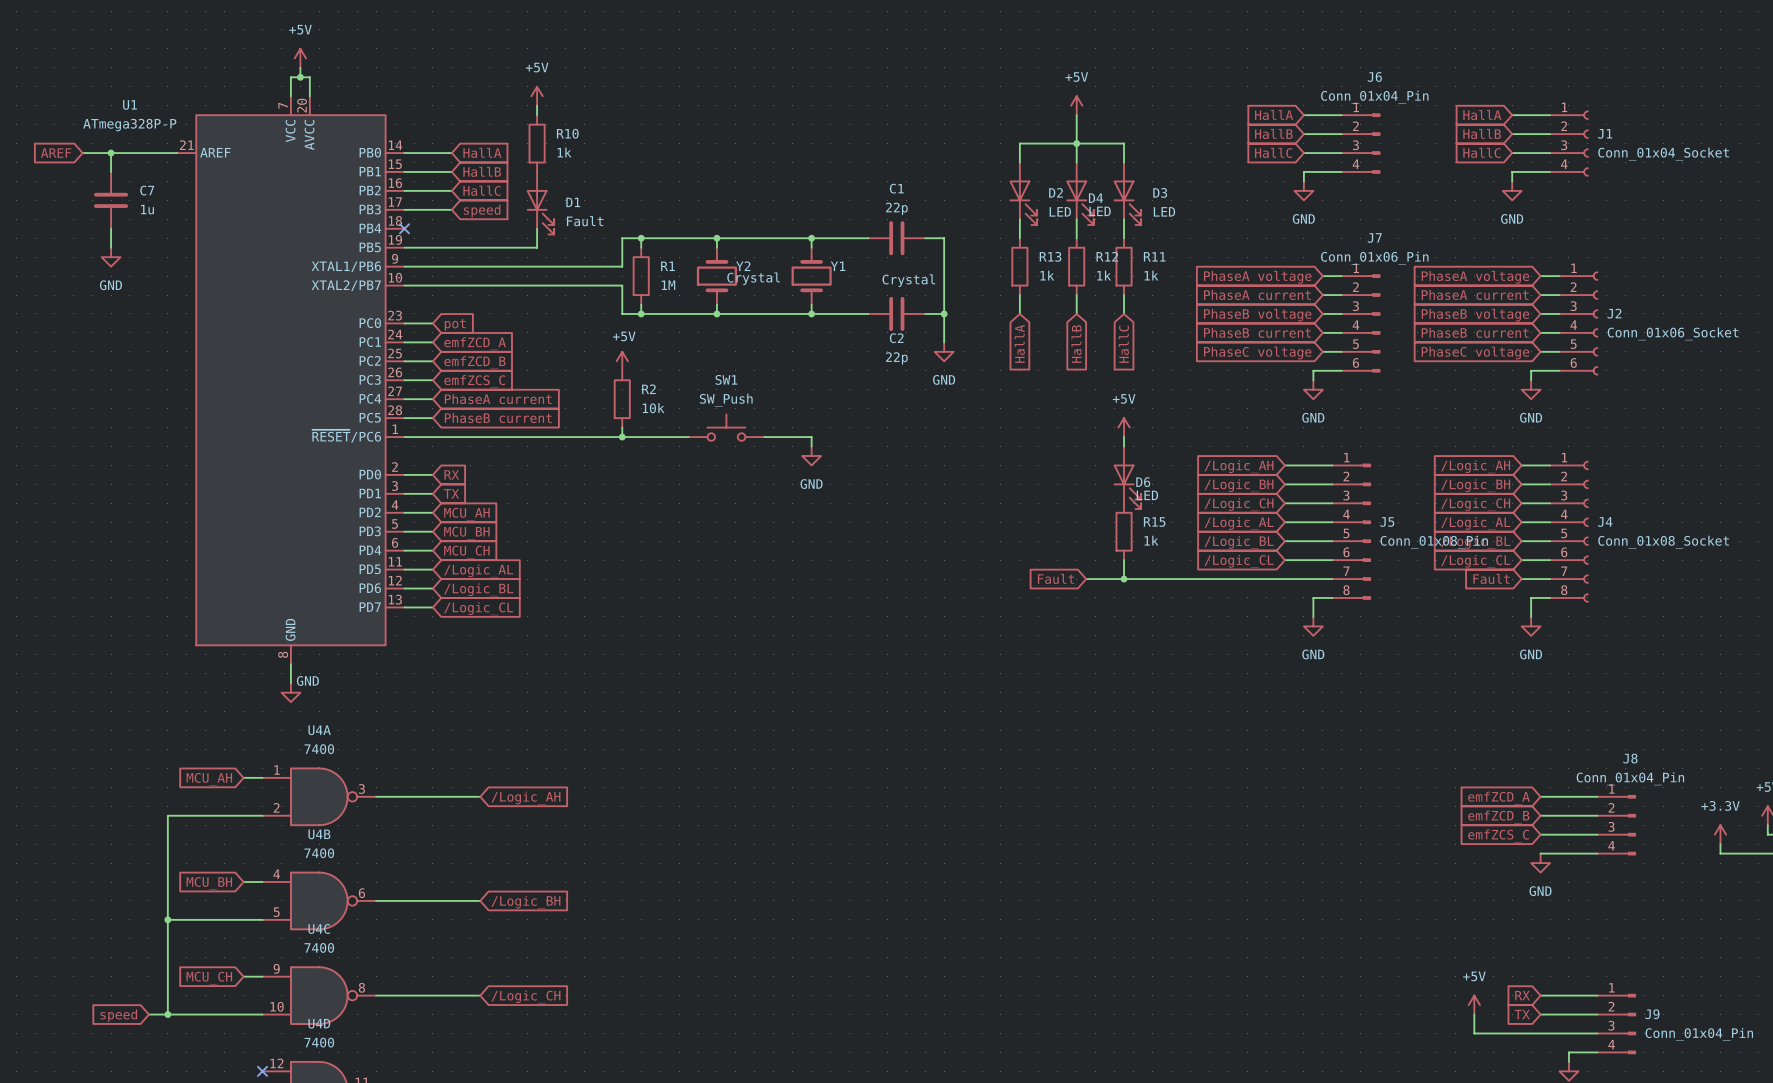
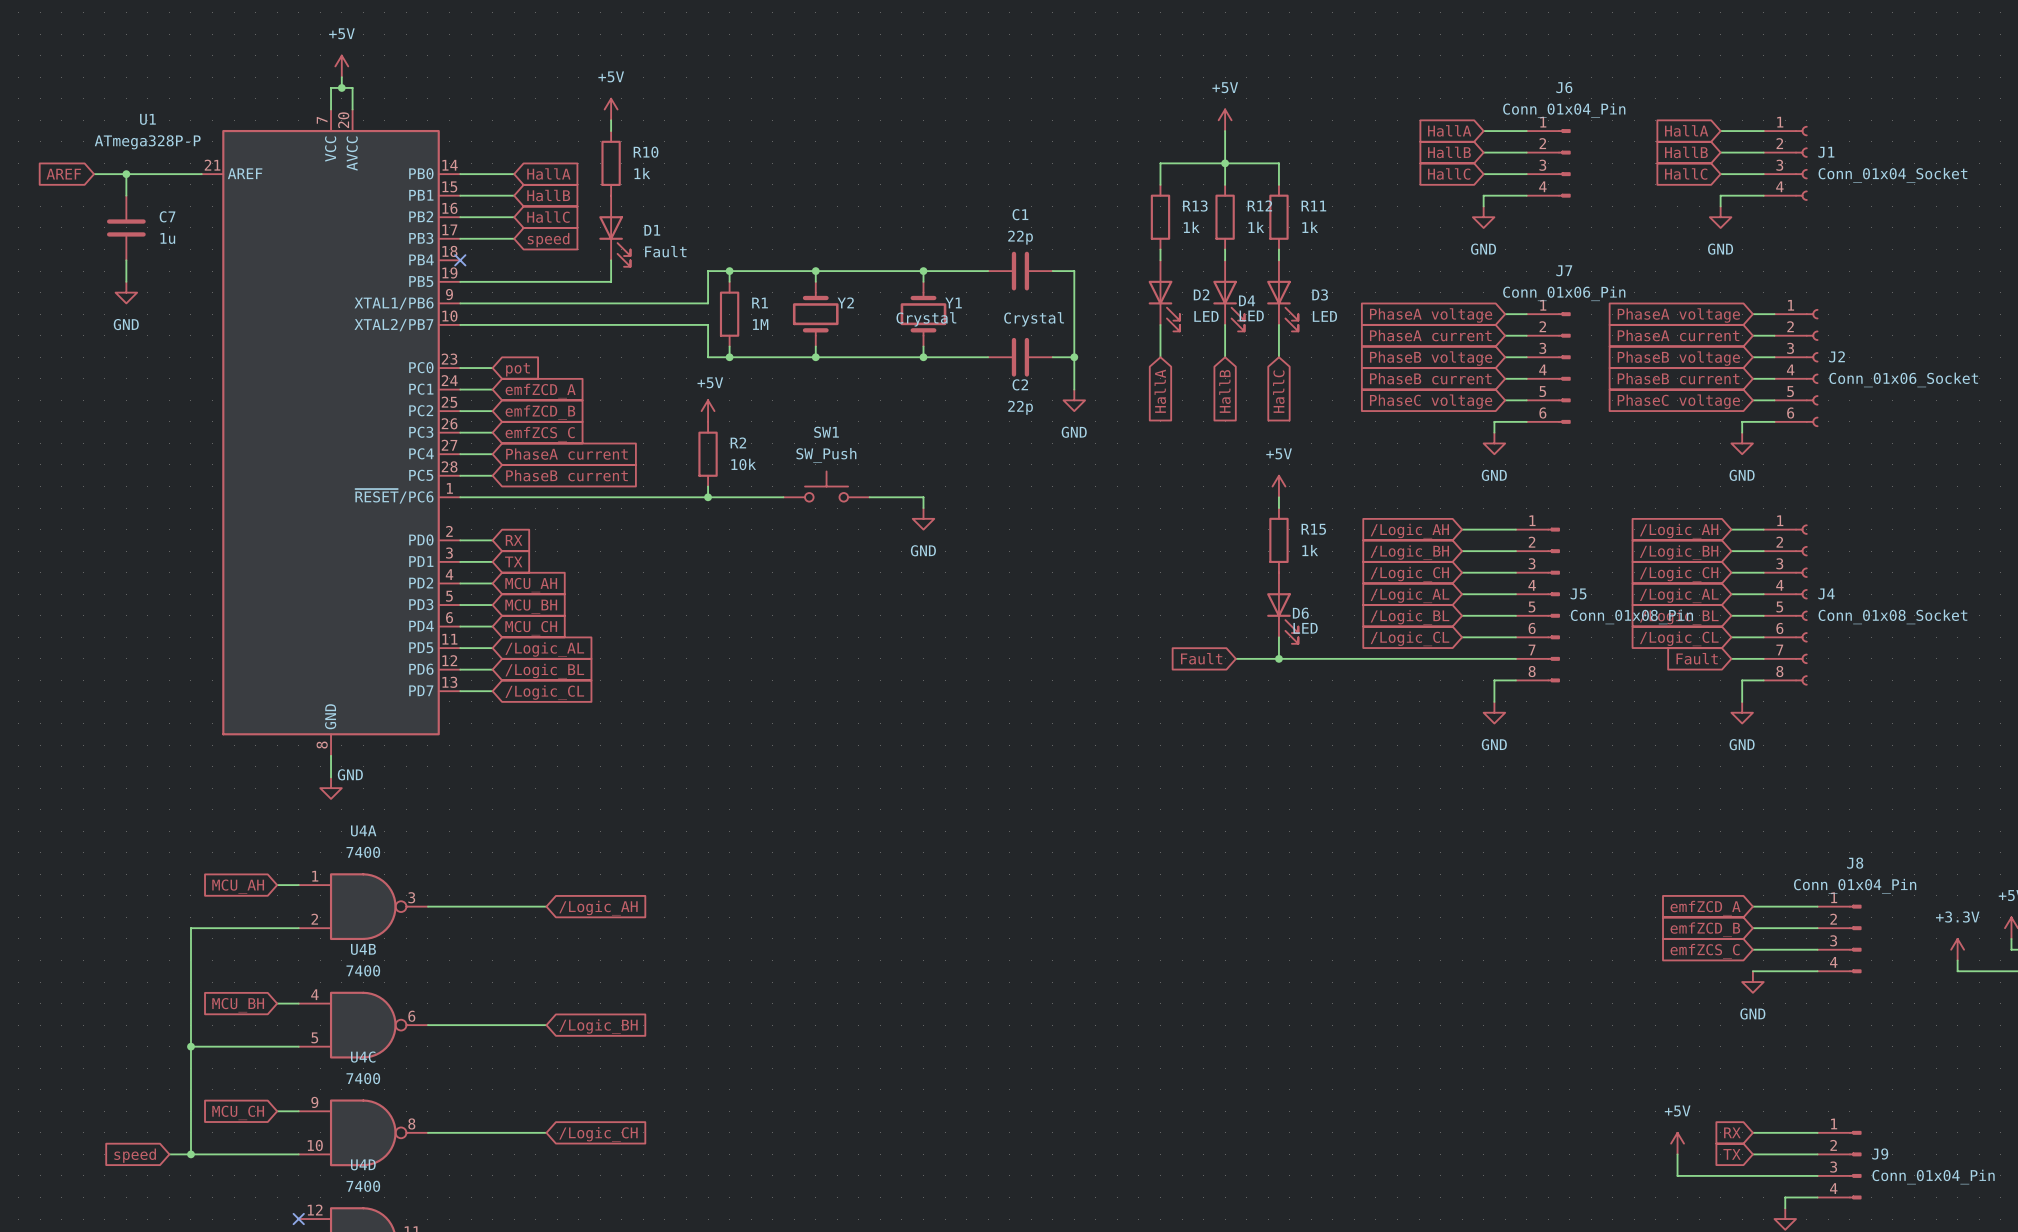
D2 position: (1023, 193) -> (1164, 295)
D4 position: (1080, 193) -> (1228, 295)
D3 position: (1127, 193) -> (1282, 295)
R13 position: (1019, 266) -> (1160, 217)
R12 position: (1076, 266) -> (1225, 217)
R11 position: (1124, 266) -> (1278, 217)
Y2 value position: Crystal (753, 278) -> Crystal (926, 319)
D6 position: (1127, 477) -> (1282, 608)
R15 position: (1124, 531) -> (1278, 540)

